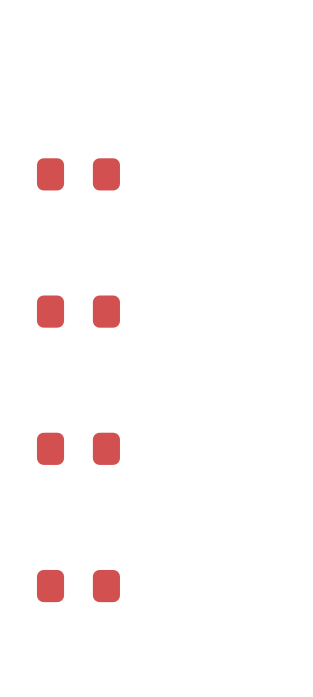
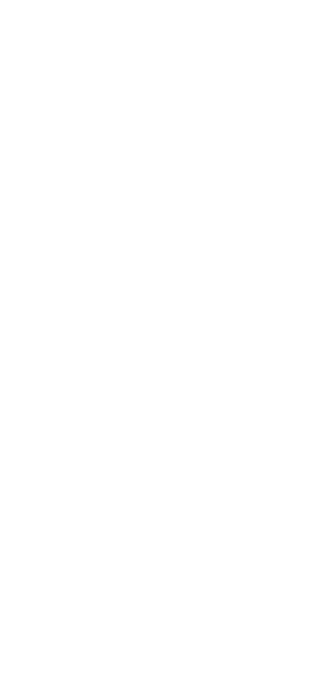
part: (78, 174) -> none
part: (78, 311) -> none
part: (78, 448) -> none
part: (78, 586) -> none

